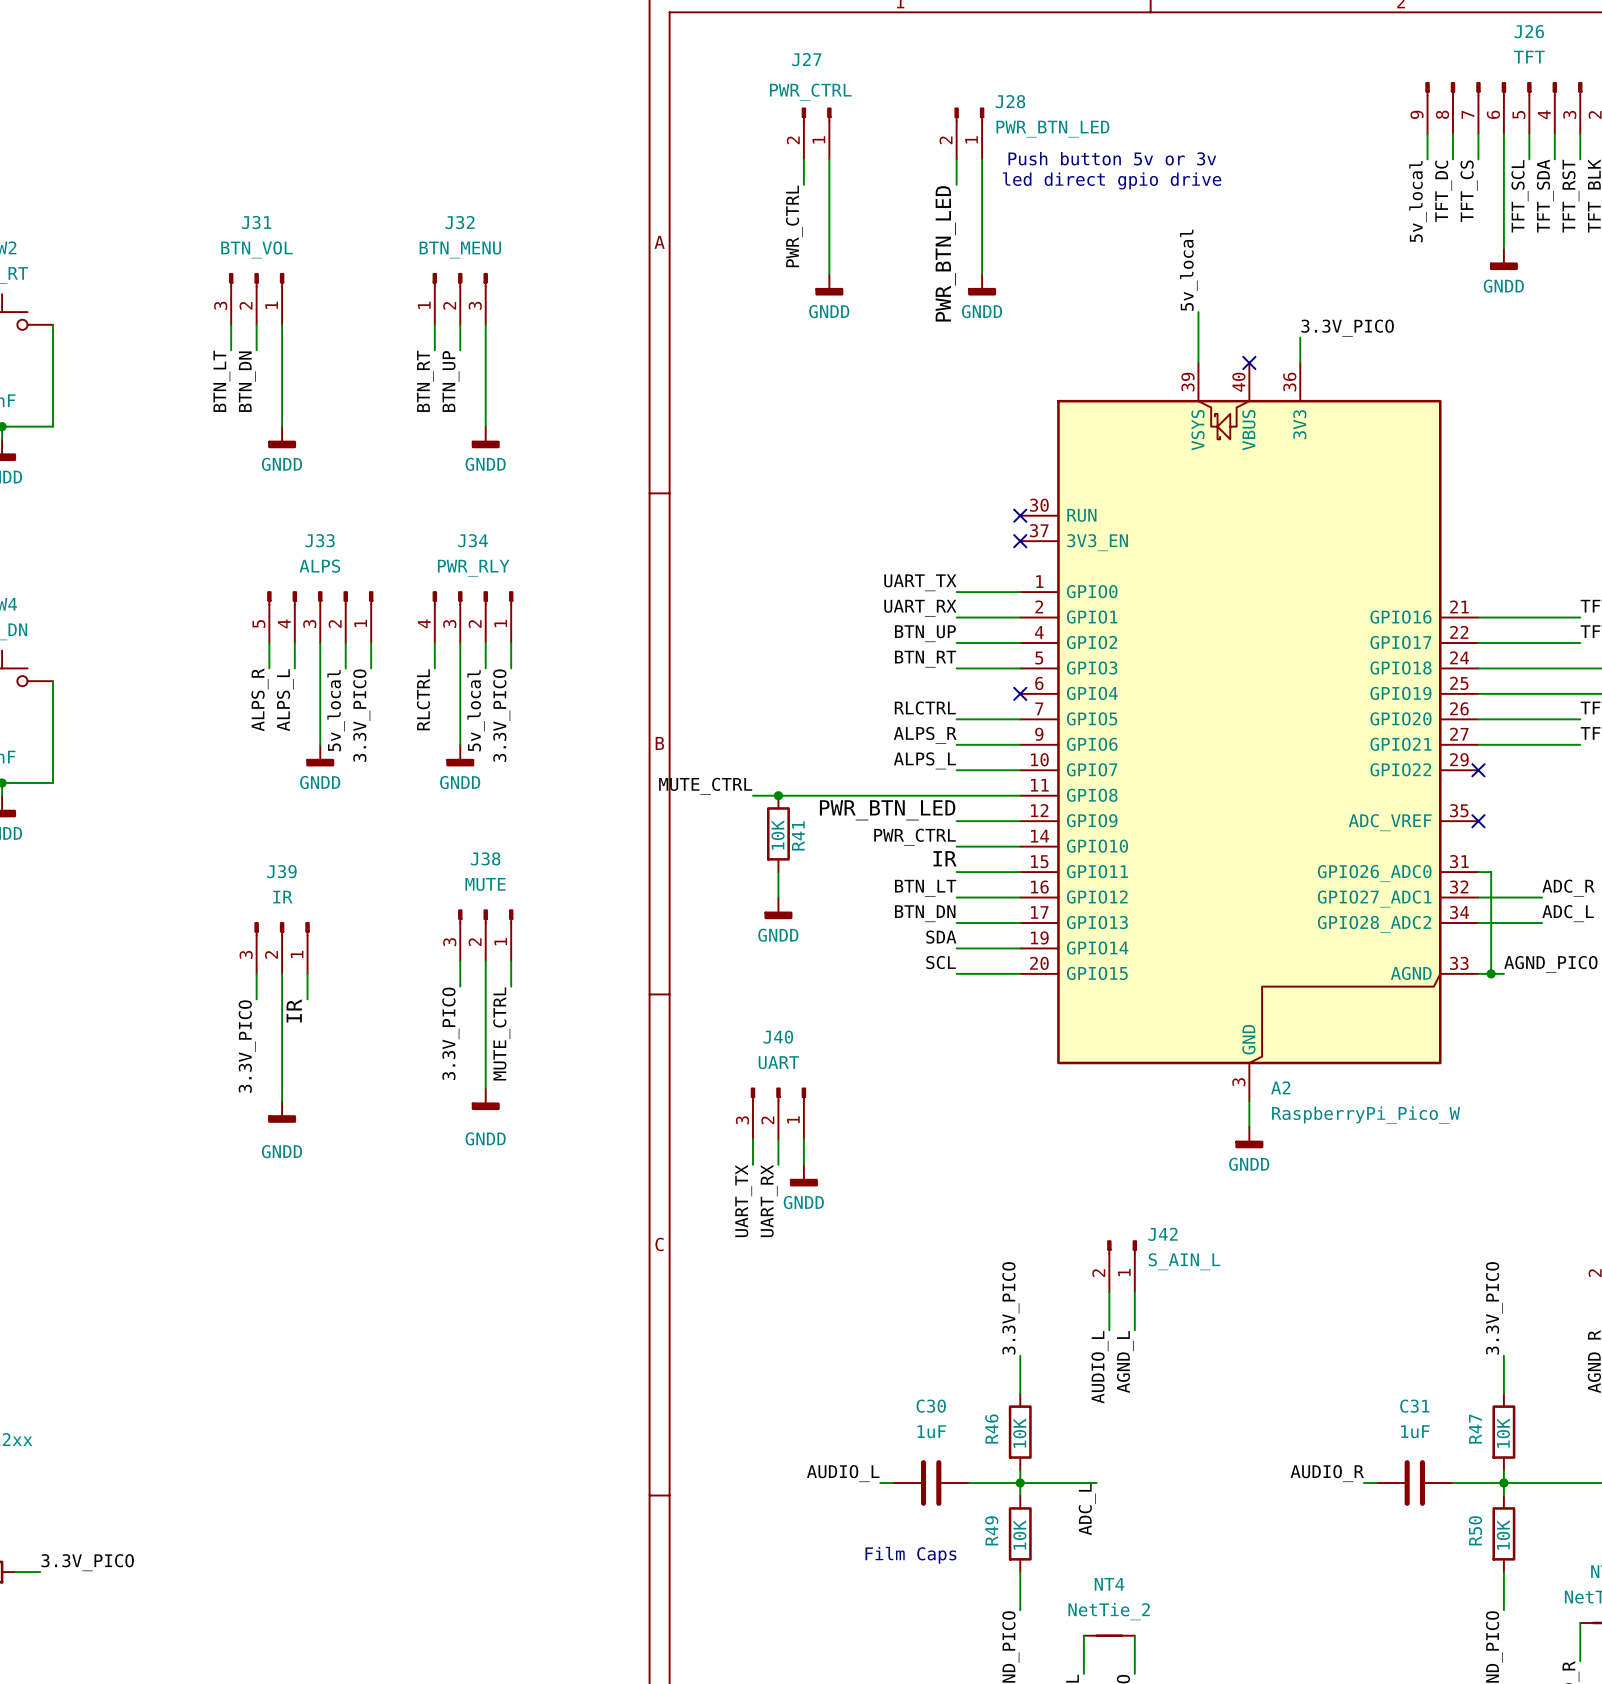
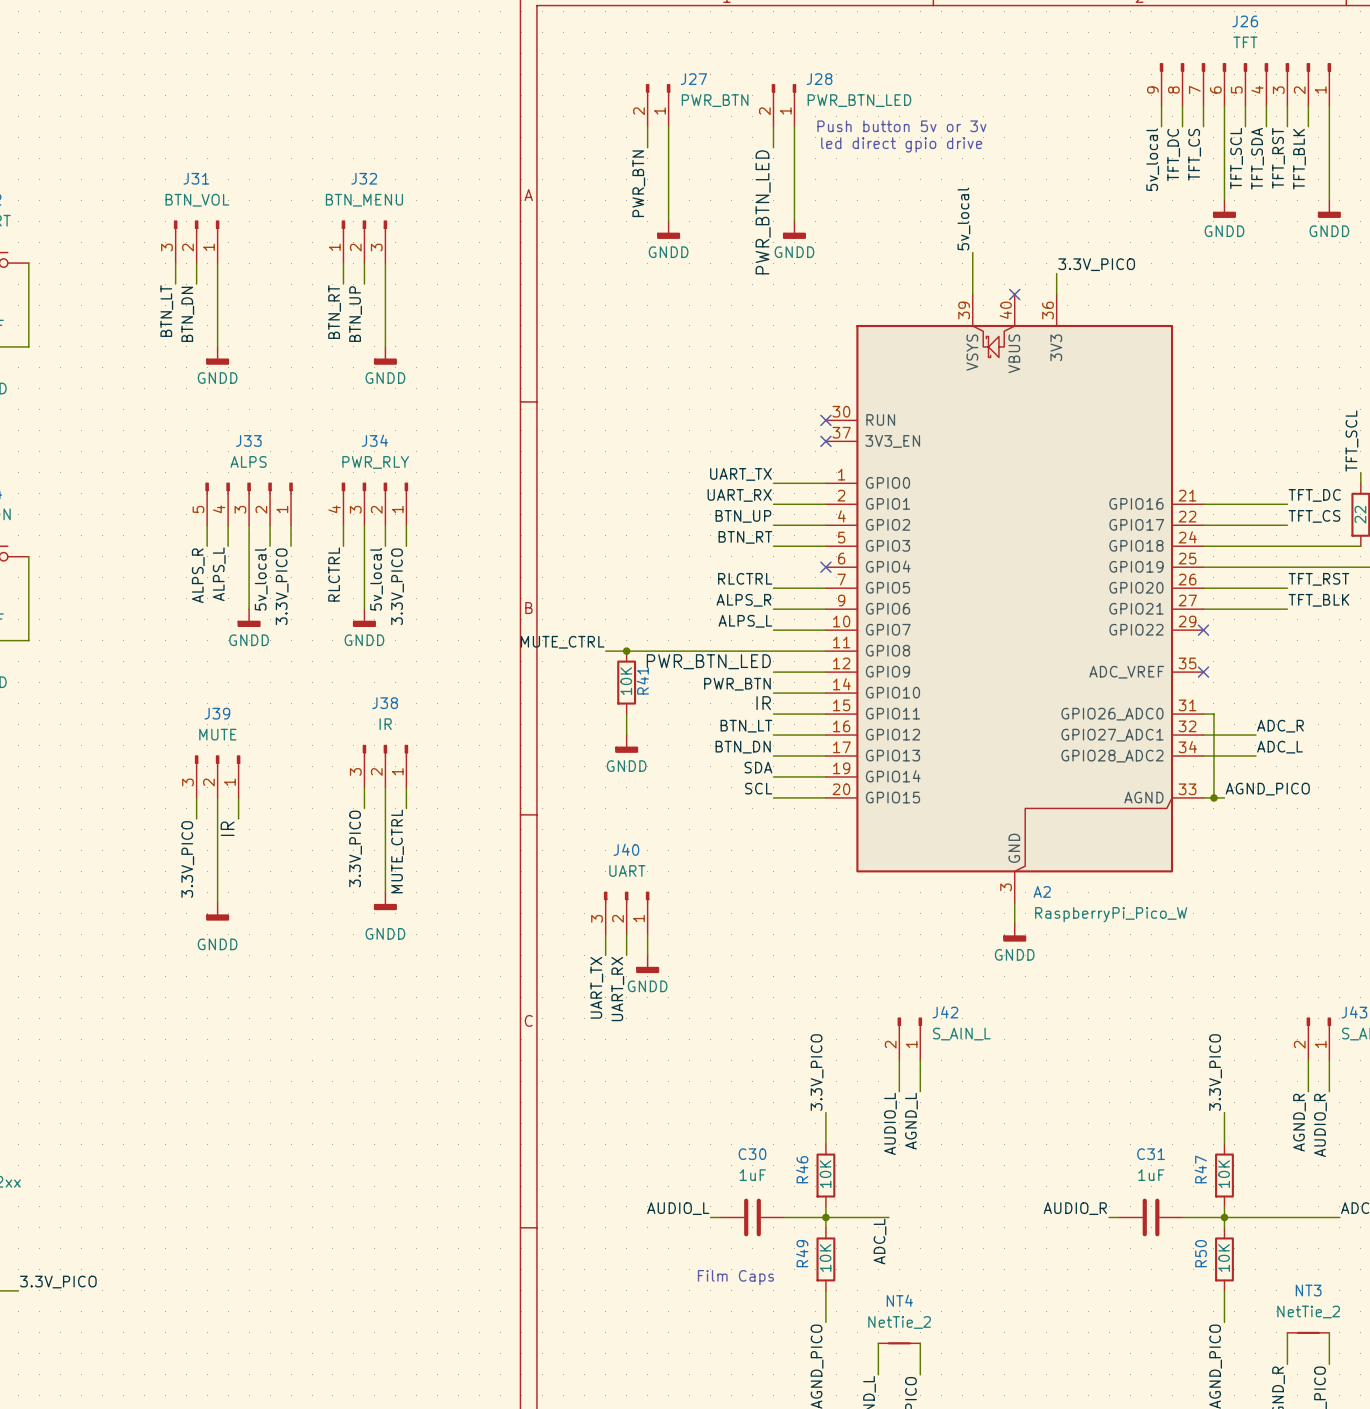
J27 name position: J27 (806, 59) -> J27 (693, 79)
J27 value: PWR_CTRL (810, 92) -> PWR_BTN (715, 100)
label: PWR_CTRL (794, 226) -> PWR_BTN (638, 183)
label: PWR_CTRL (915, 837) -> PWR_BTN (737, 684)
J38 value: MUTE (485, 884) -> IR (385, 724)
J39 value: IR (282, 897) -> MUTE (217, 734)

